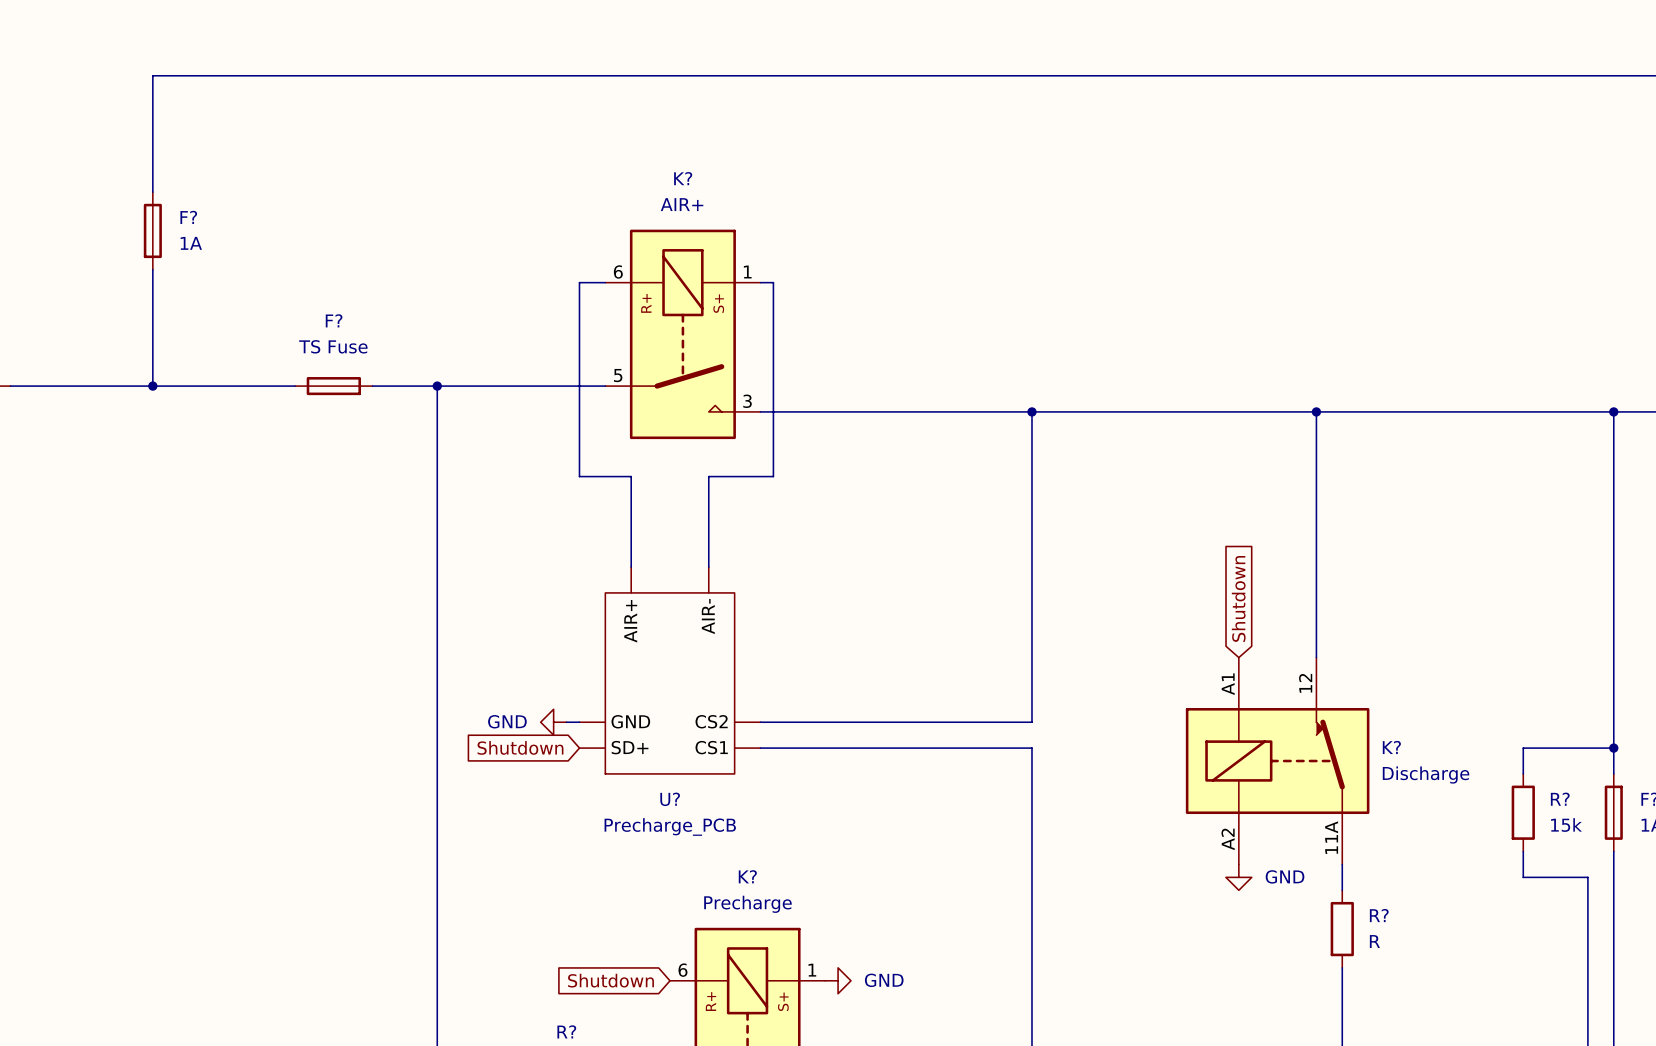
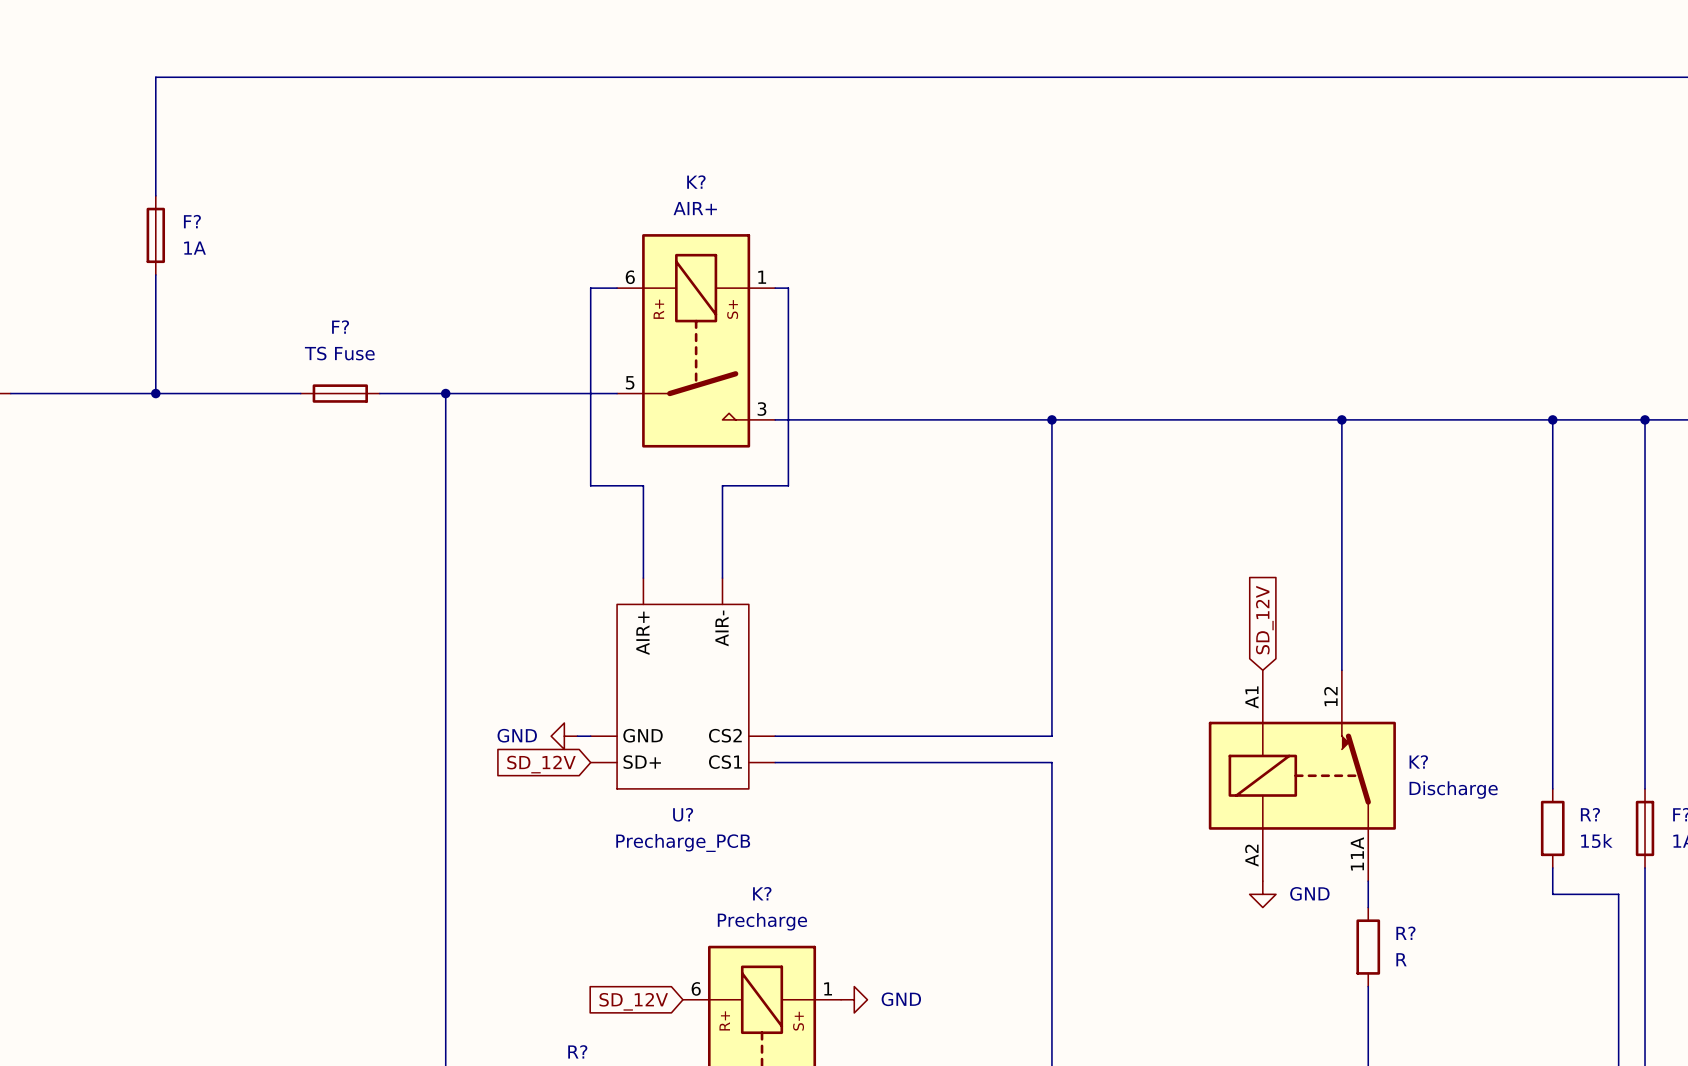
junction: none -> (1552, 419)
global label: Shutdown (1238, 598) -> SD_12V (1264, 620)
global label: Shutdown (520, 747) -> SD_12V (541, 764)
wire: (1523, 748) (1613, 748) -> (1552, 762) (1552, 419)
junction: (1613, 748) -> none
global label: Shutdown (611, 980) -> SD_12V (633, 1001)

